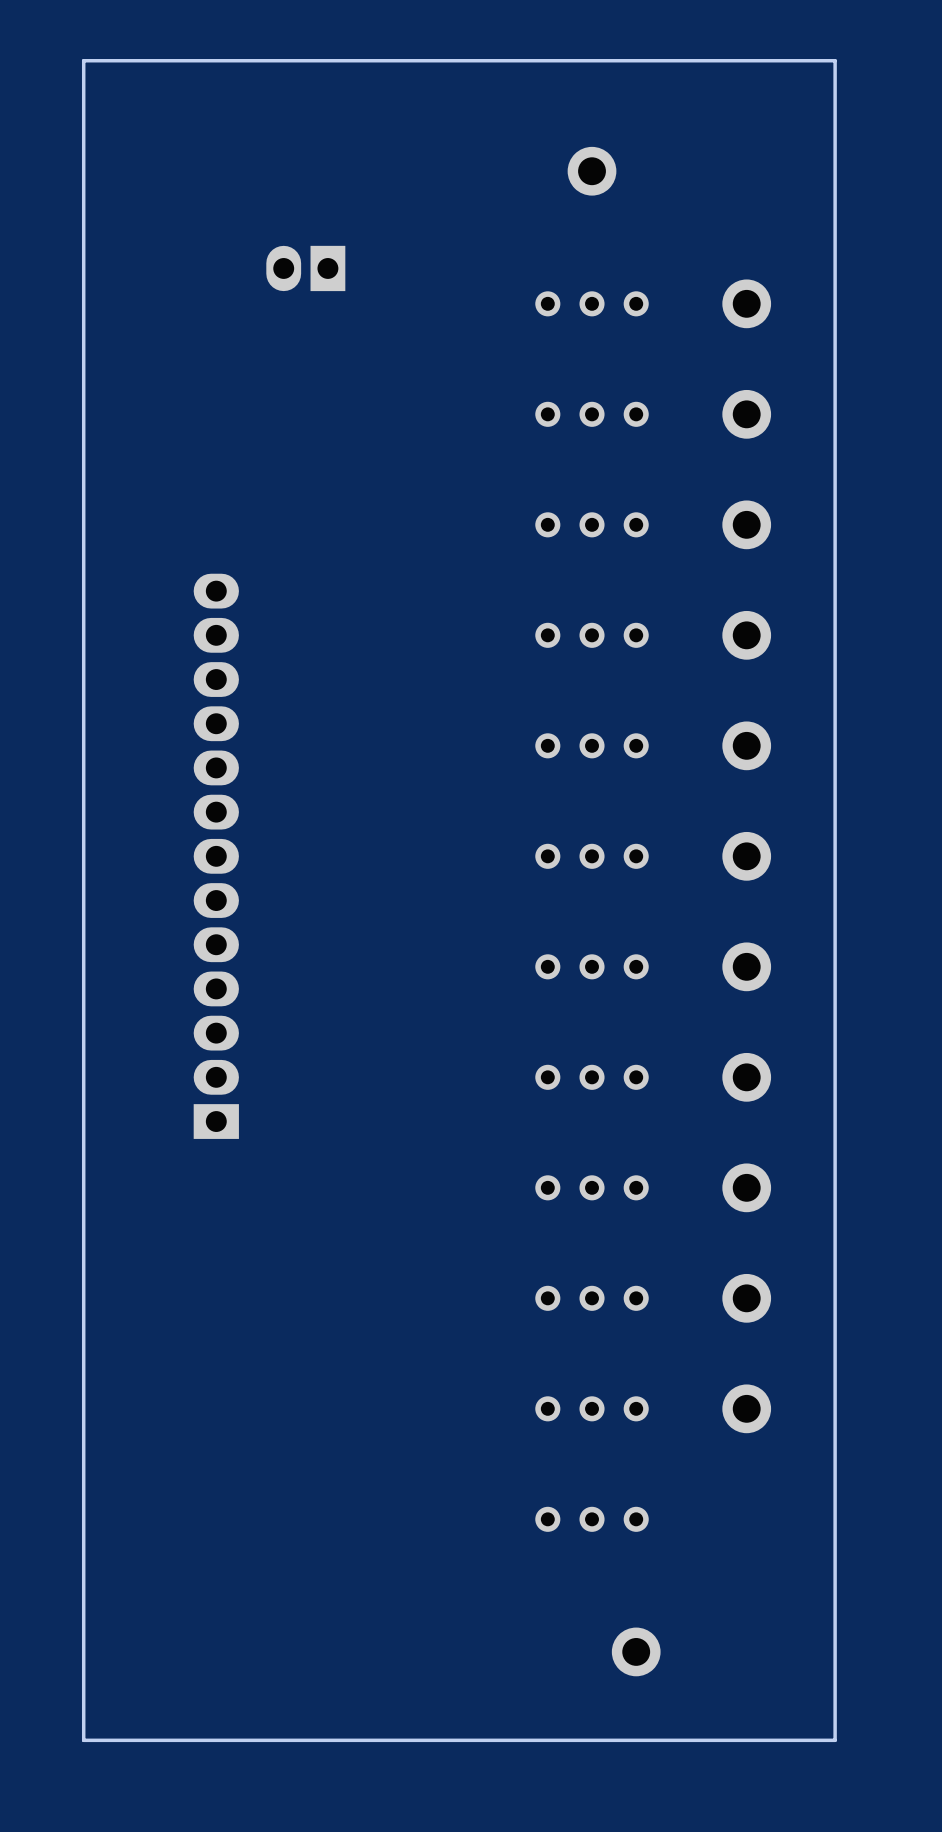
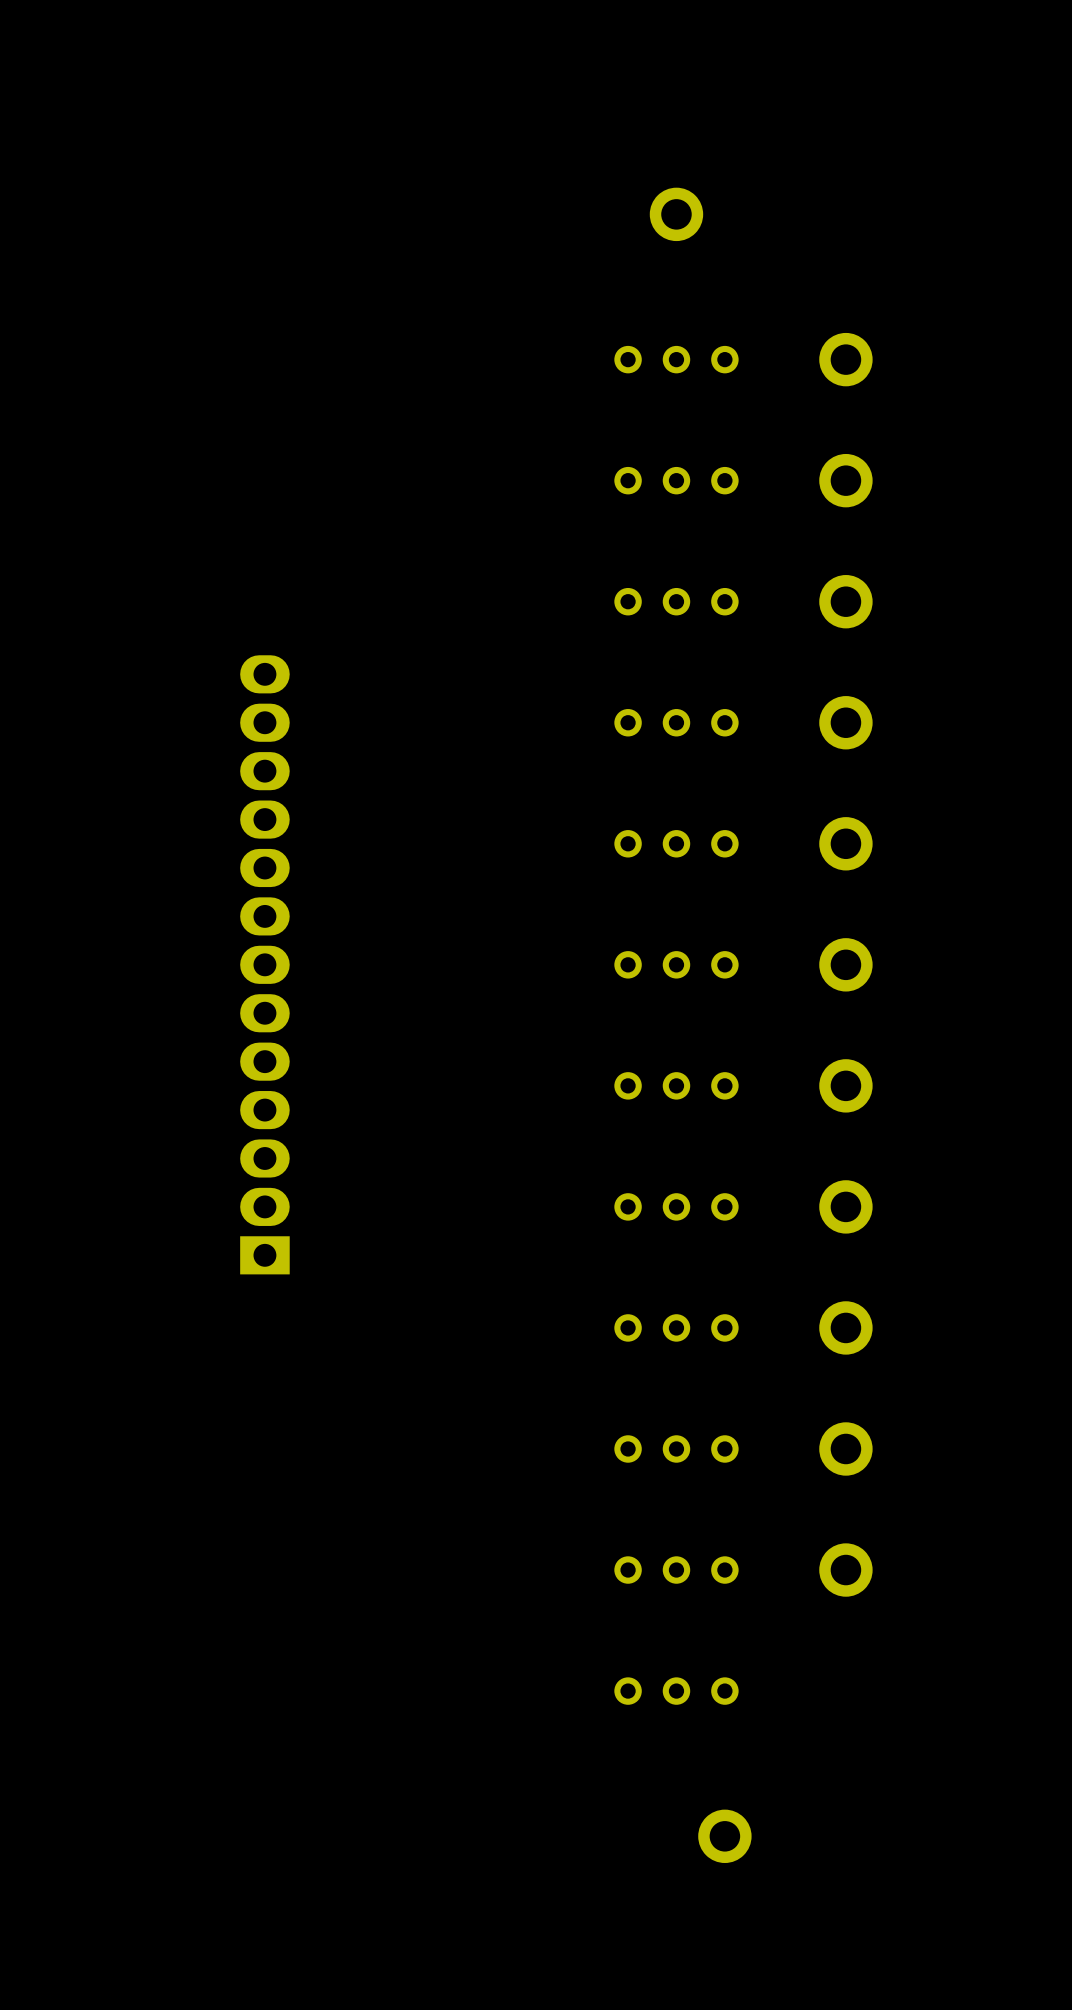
board edge: (835, 60) (83, 60) (83, 1740) (835, 1740) (835, 60) -> none
part: (305, 268) -> none

